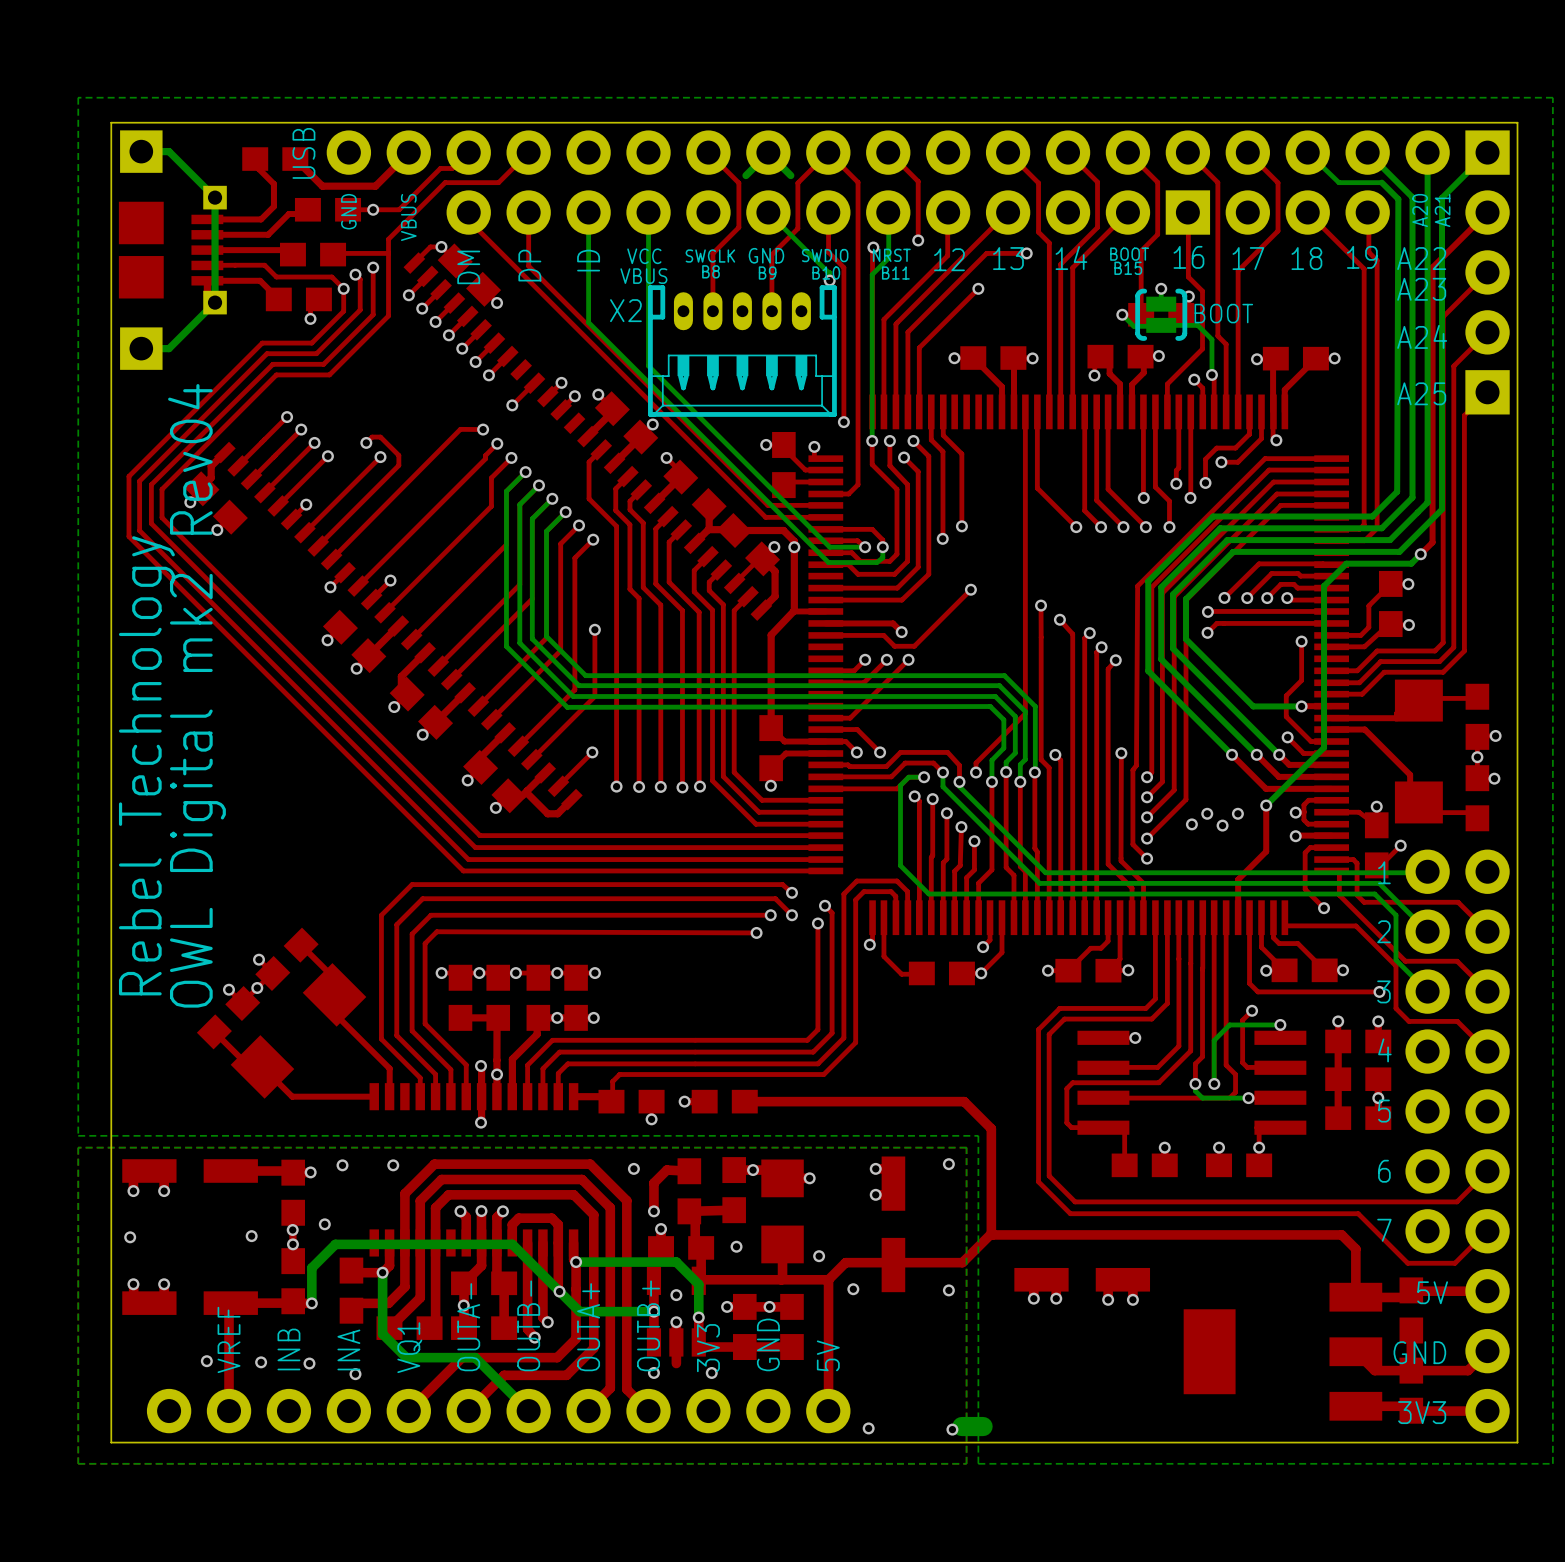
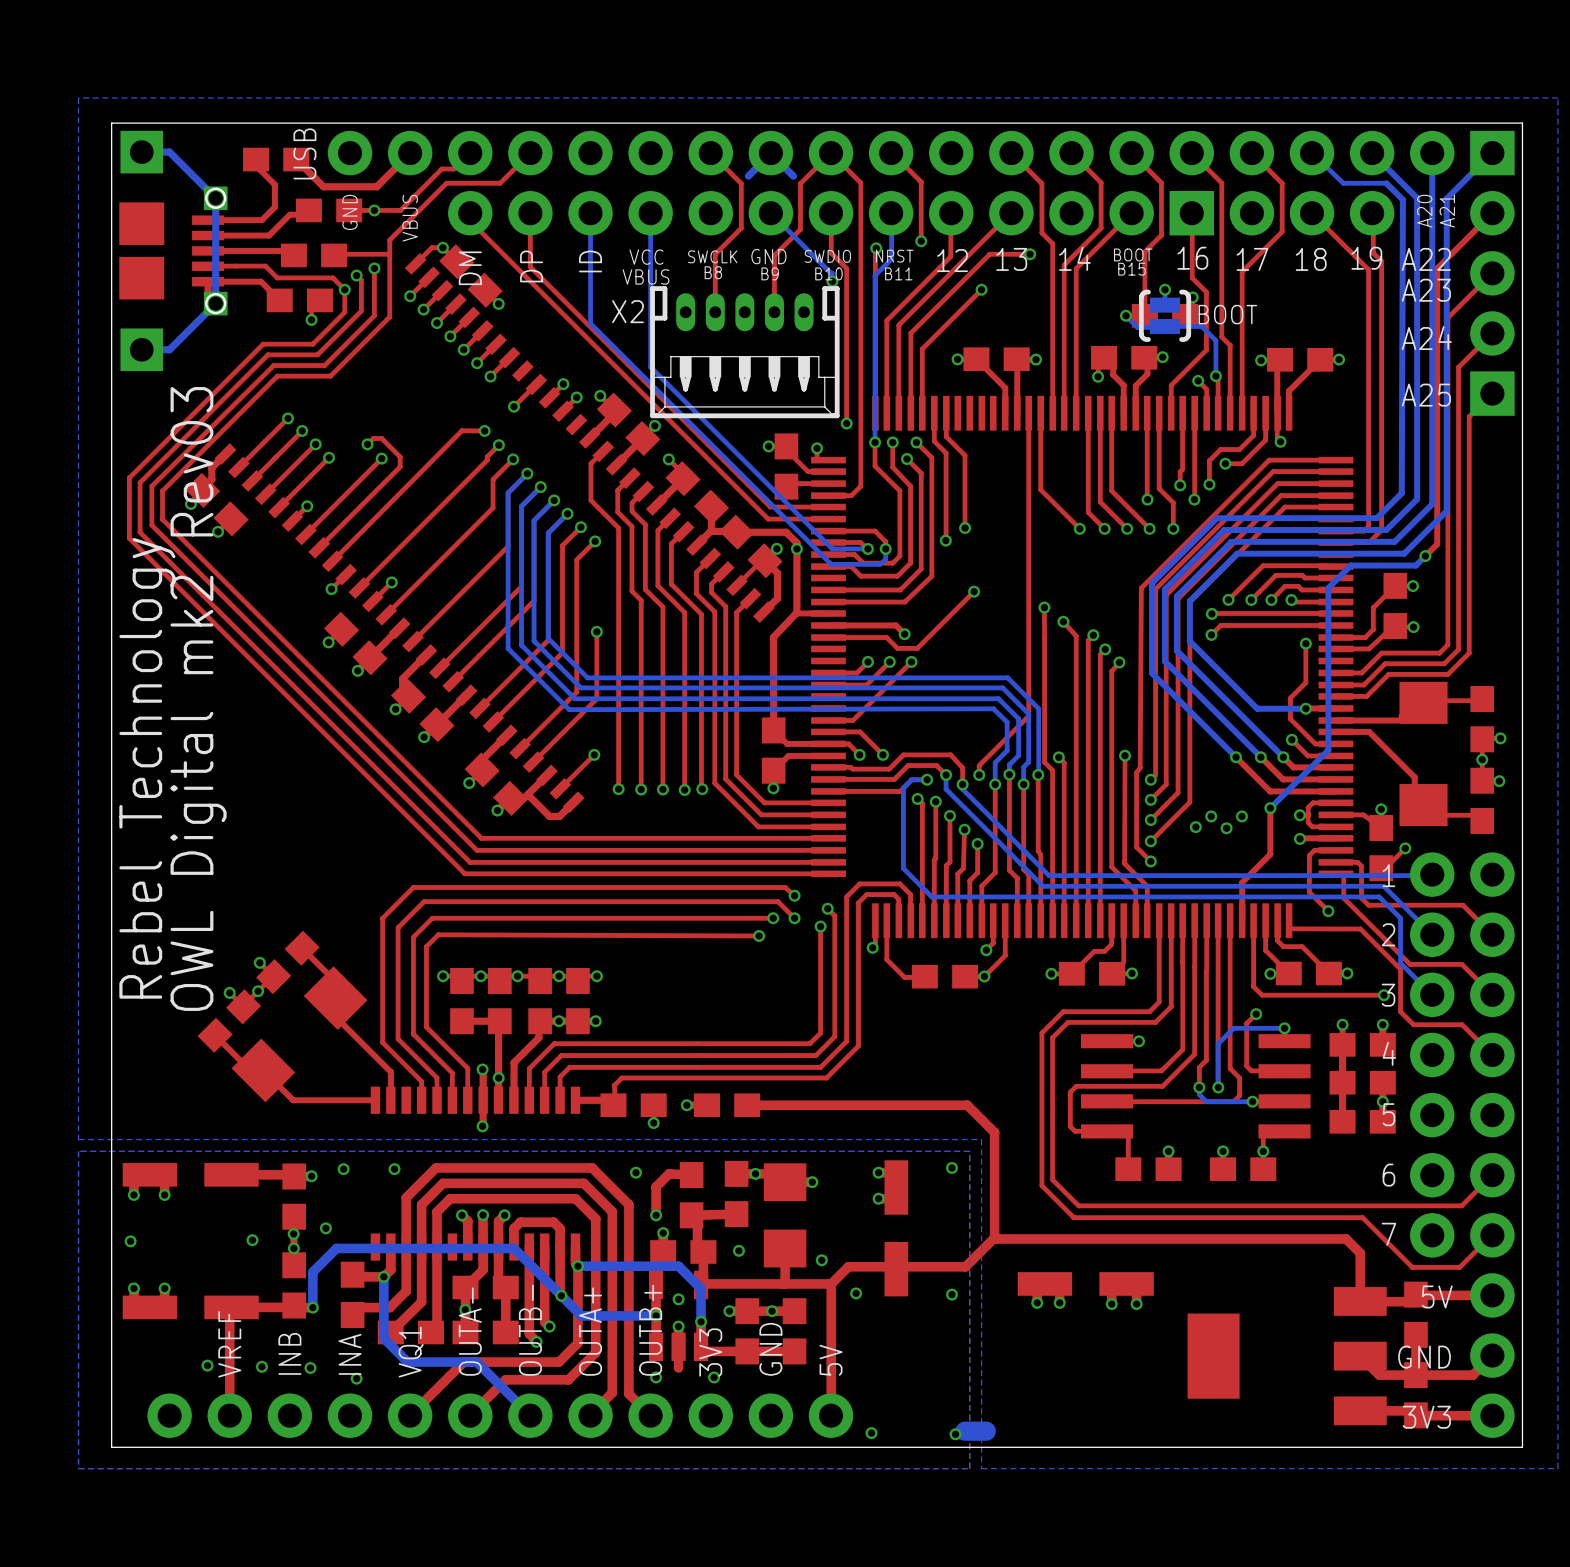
text: OWL Digital mk2 Rev04 (196, 695) -> OWL Digital mk2 Rev03 (198, 698)

